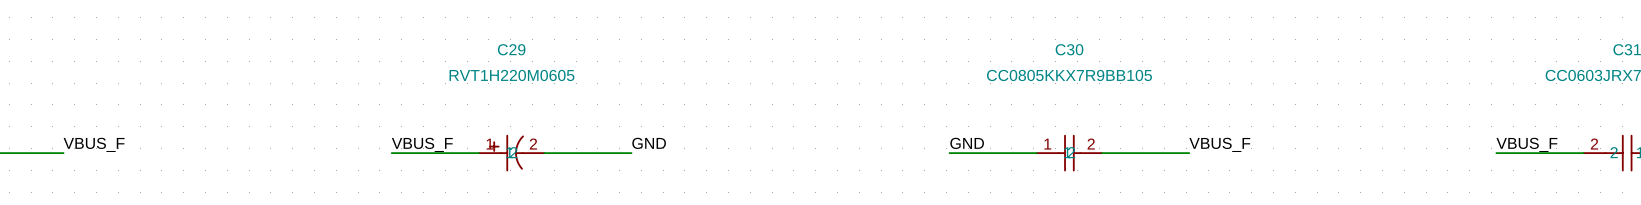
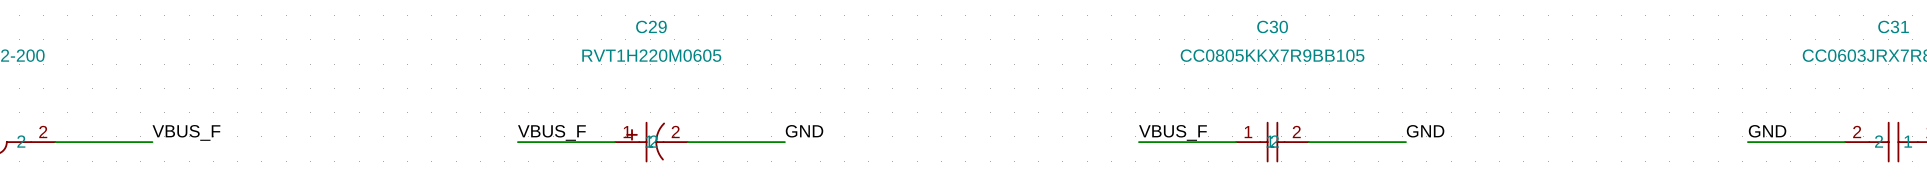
label: GND (967, 143) -> VBUS_F (1172, 132)
label: VBUS_F (1219, 144) -> GND (1425, 131)
label: VBUS_F (1526, 144) -> GND (1767, 131)

